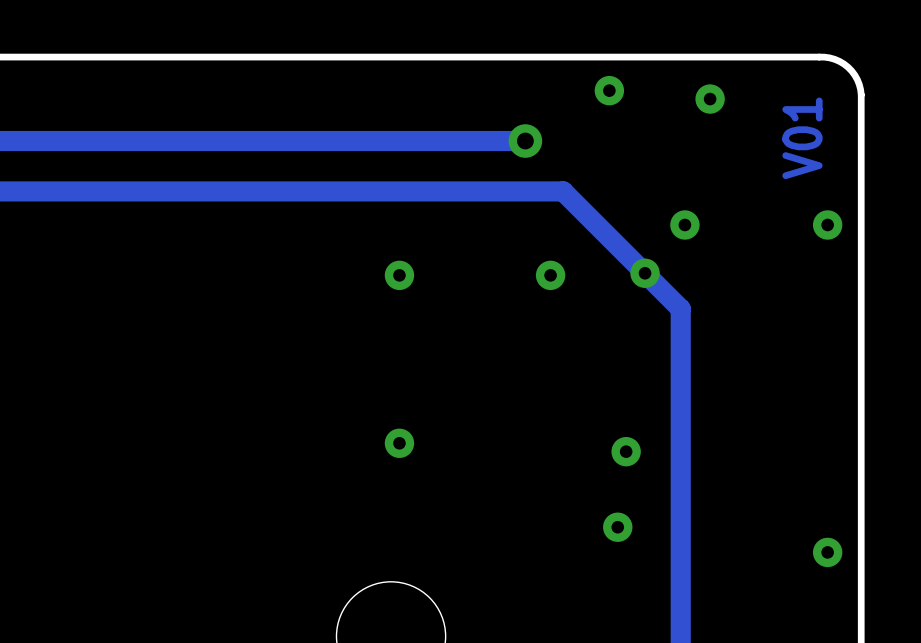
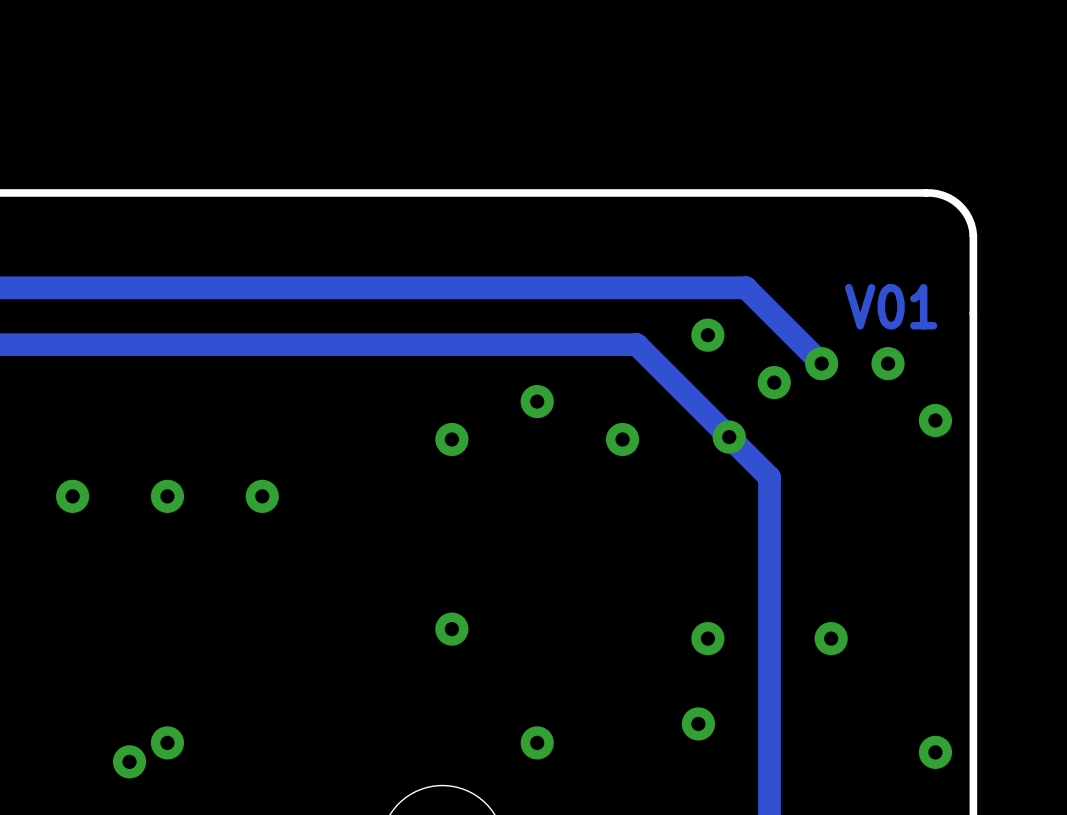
via: (609, 90) -> none
via: (710, 99) -> none
text rotation: 0° (802, 138) -> 90° clockwise (891, 306)
track: none -> (594, 287) (745, 287) (821, 363)
via: (525, 141) -> none
via: none -> (707, 335)
via: none -> (821, 363)
via: none -> (888, 363)
via: (827, 224) -> none
via: none -> (537, 401)
via: none -> (935, 420)
via: none -> (72, 496)
via: none -> (167, 496)
via: none -> (262, 496)
via: none -> (831, 638)
via: none -> (167, 742)
via: none -> (537, 742)
via: none -> (129, 761)

